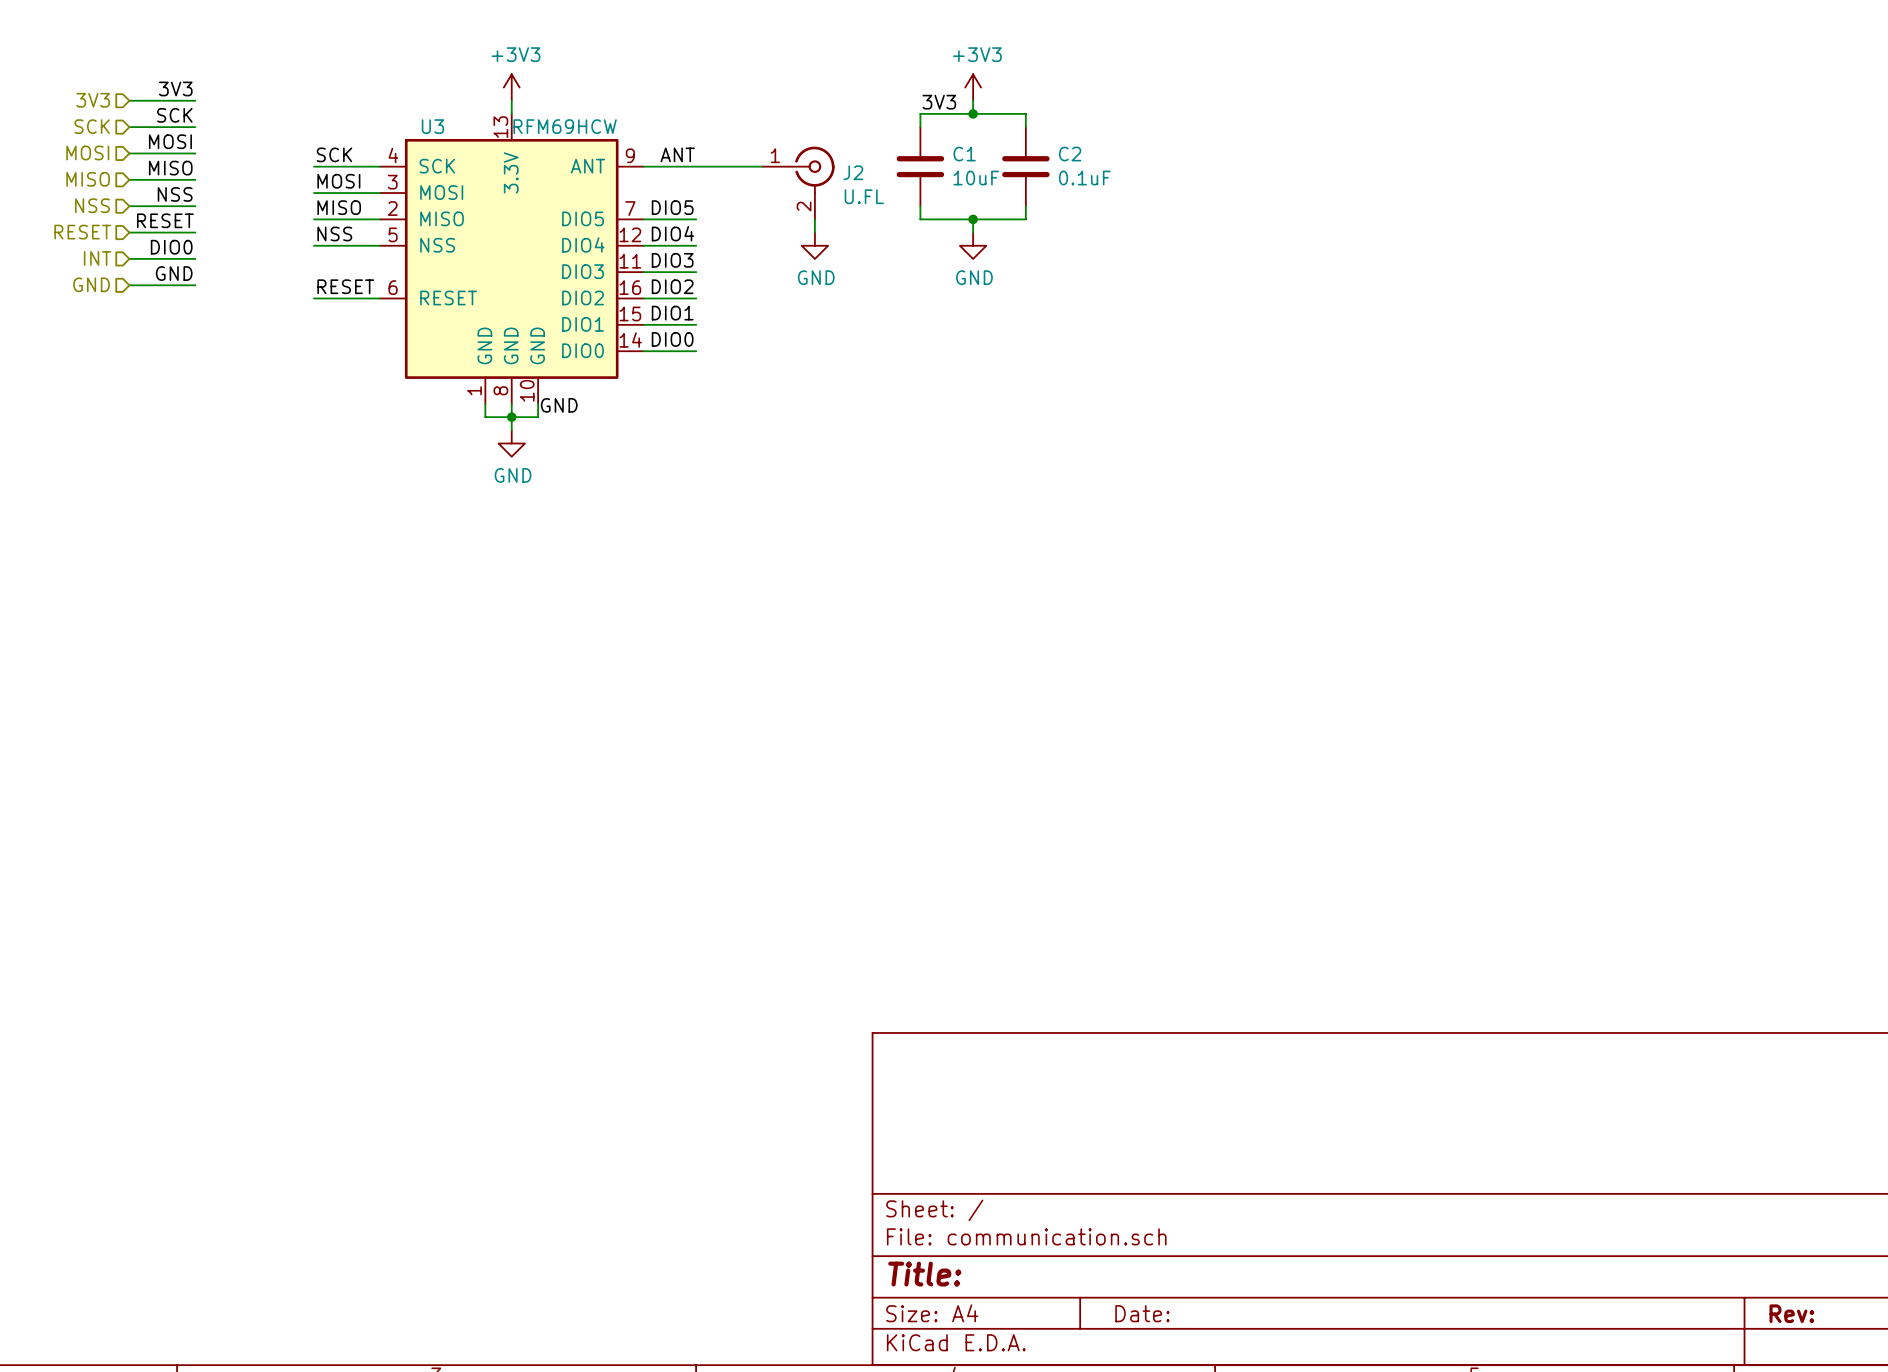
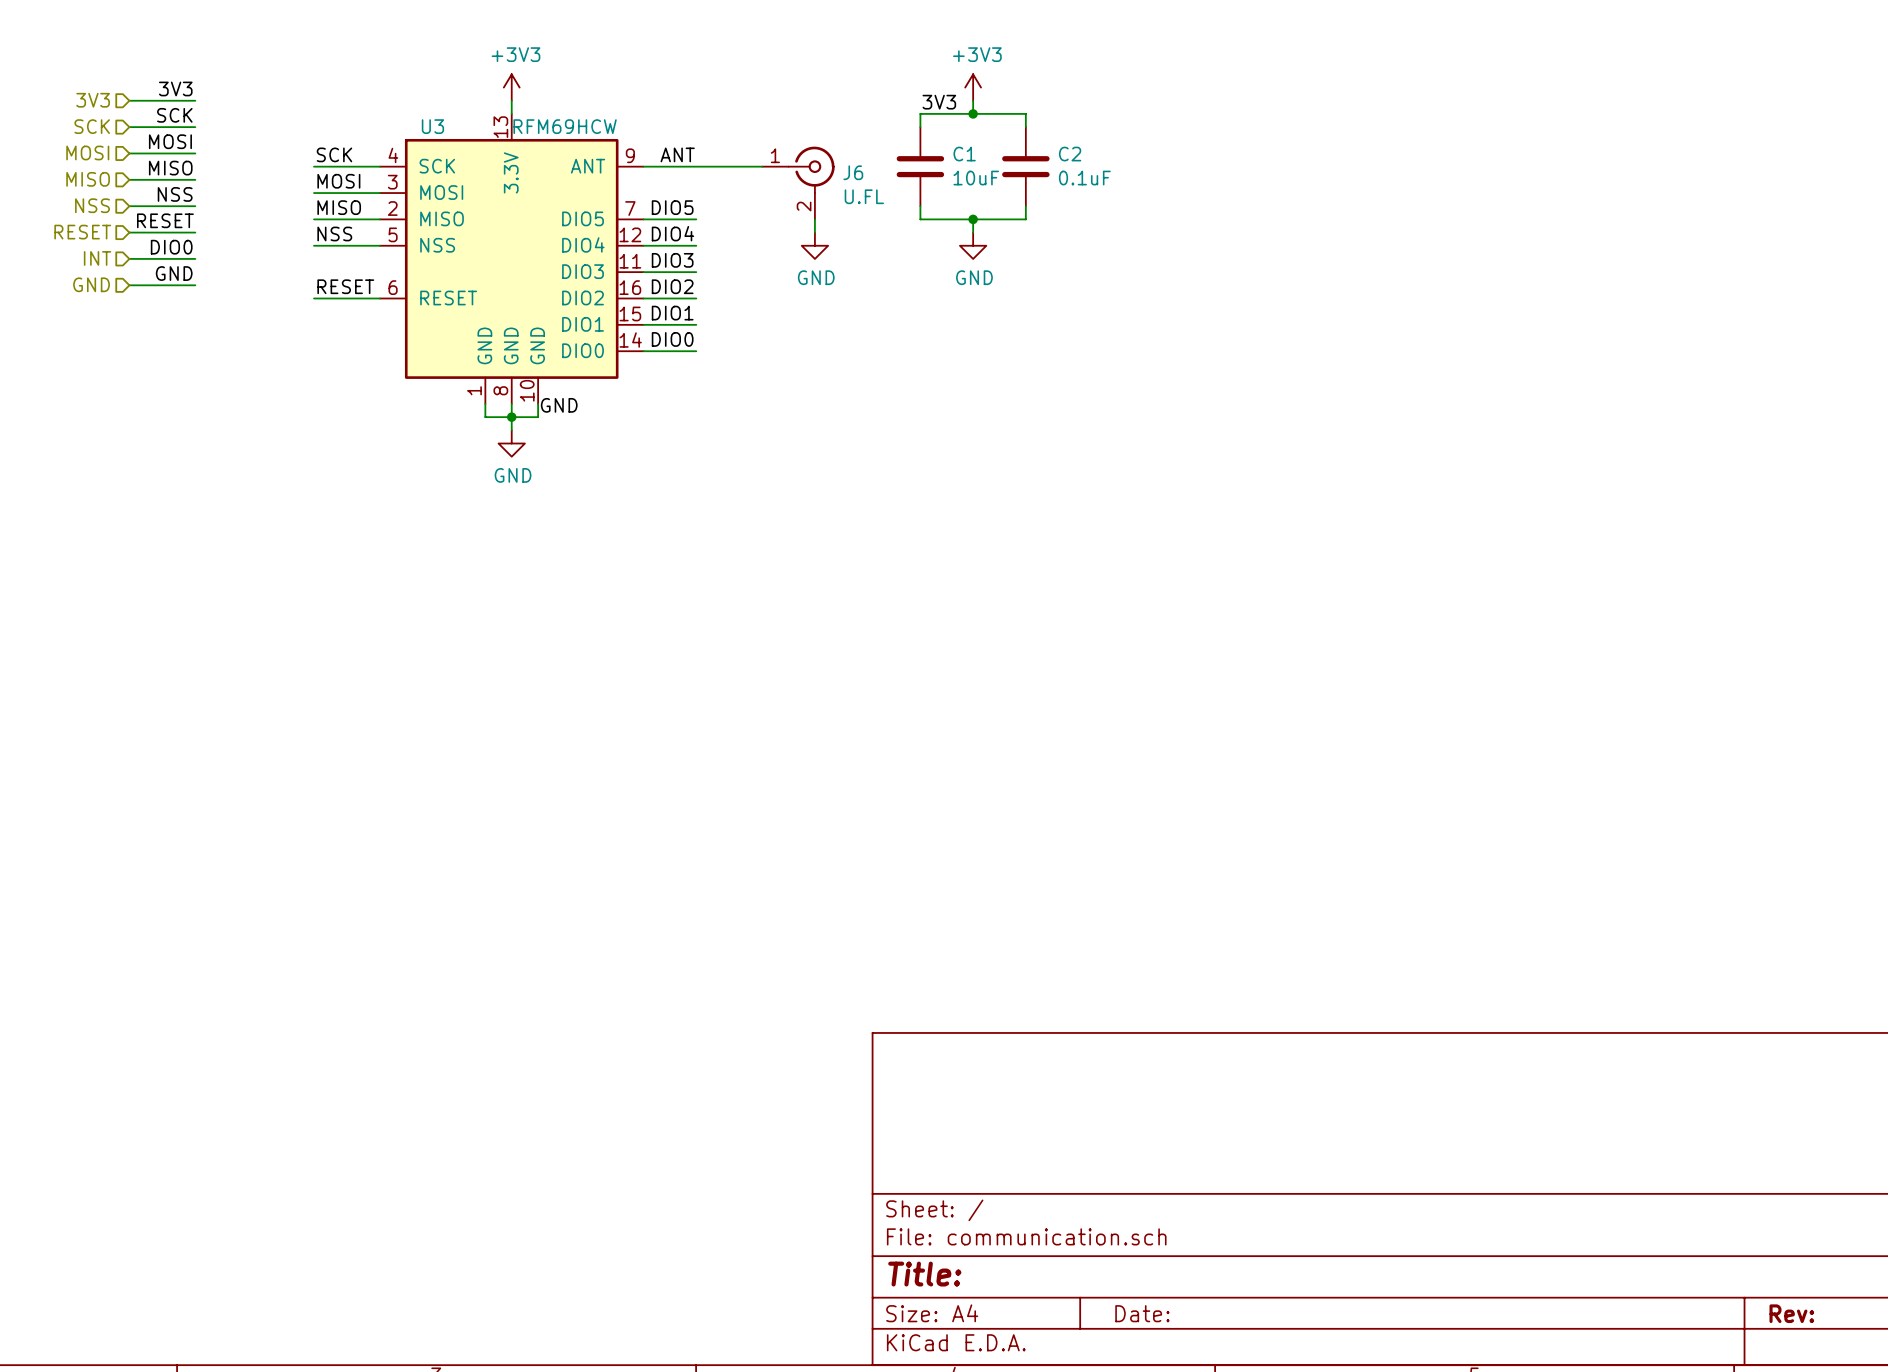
J2 name: J2 (853, 172) -> J6 (853, 172)

